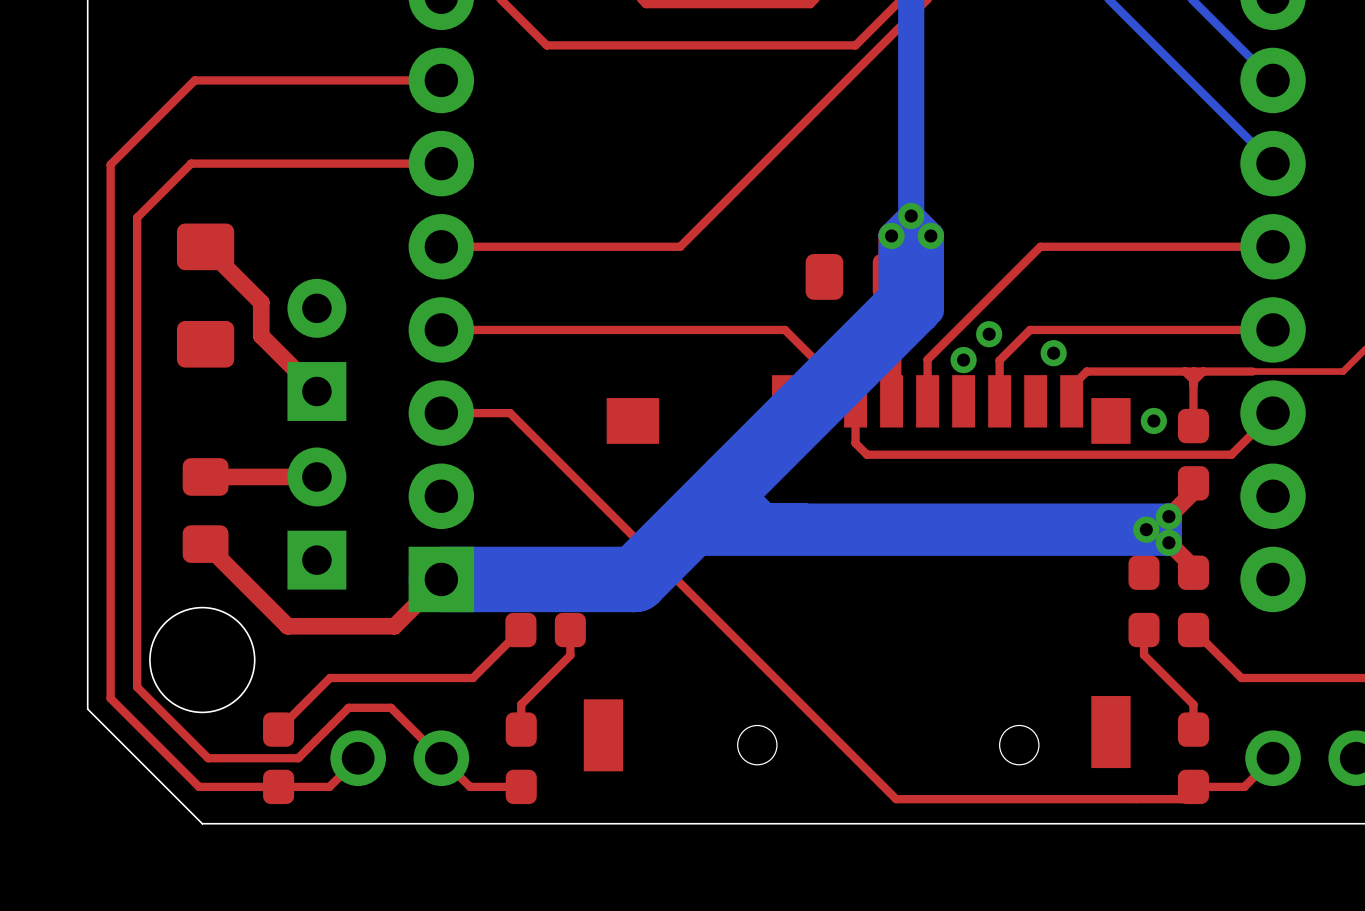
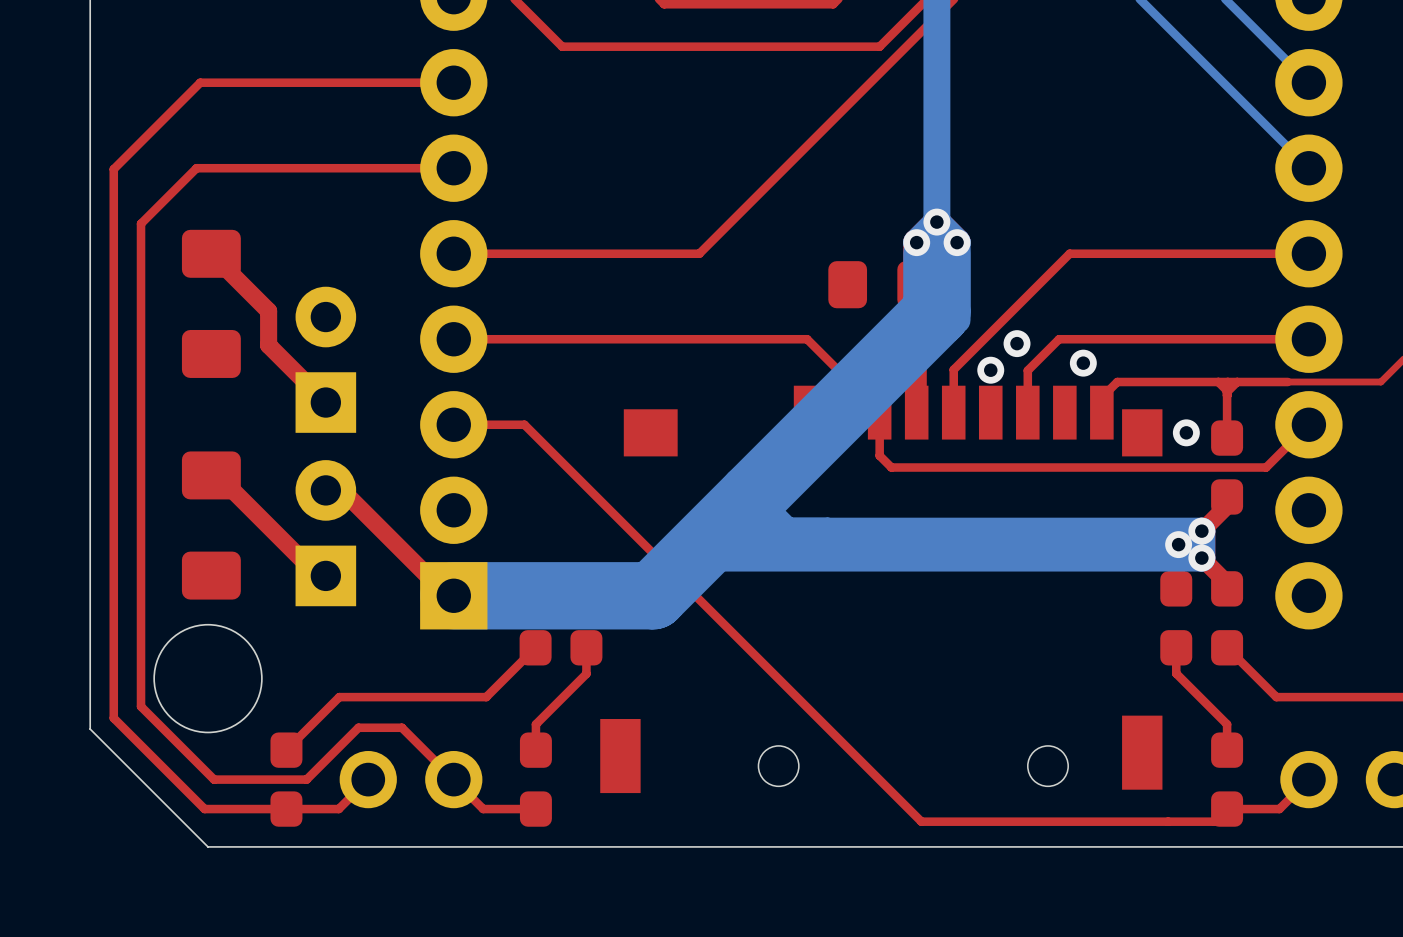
part footprint: [182, 458, 229, 563] -> [181, 451, 241, 600]
top track: none -> (211, 475) (217, 475) (318, 575) (325, 575)
top track: (316, 476) (205, 476) -> none
top track: (205, 544) (287, 626) (394, 626) (441, 579) -> (325, 490) (342, 490) (447, 595) (453, 595)

